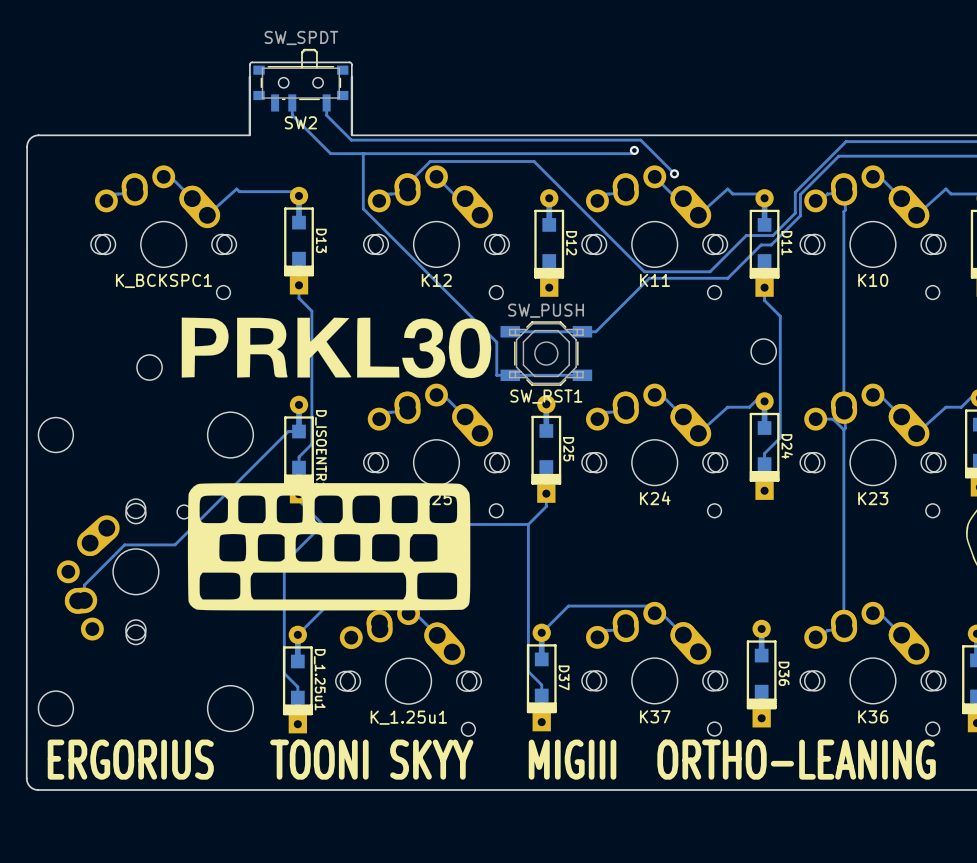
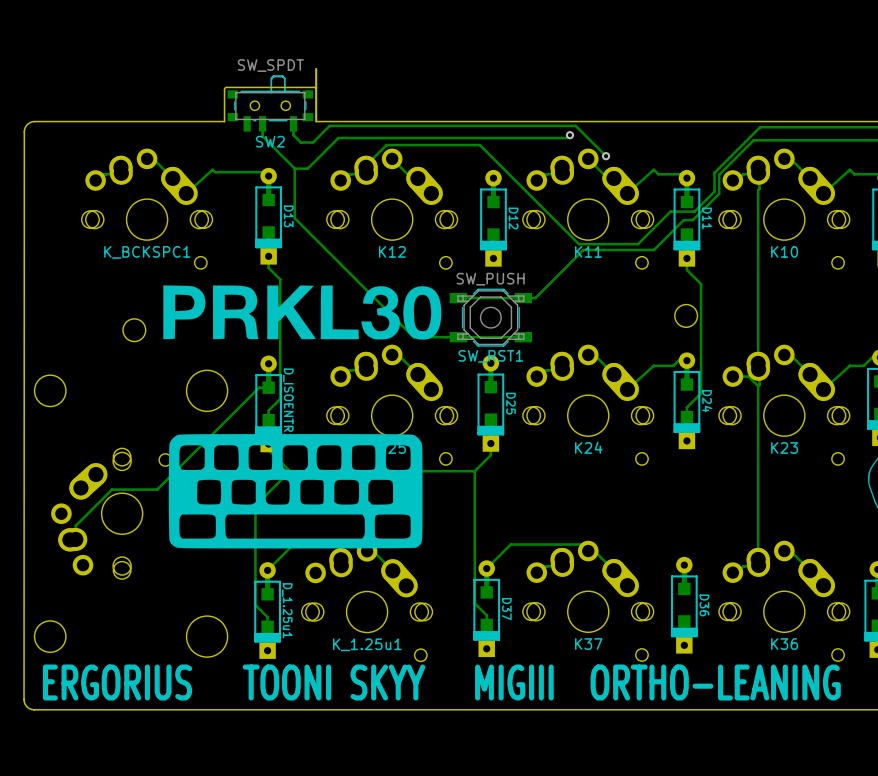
board edge: (249, 76) (249, 135) -> (316, 89) (314, 87) (225, 87) (224, 121)
board edge: (351, 76) (351, 64) (349, 62) (251, 62) (249, 64) (249, 76) -> none
SW2 position: (300, 80) -> (270, 103)
track: (292, 102) (292, 115) (330, 153) (376, 153) -> (294, 168) (307, 168) (338, 138)
track: (326, 102) (326, 115) (351, 140) (366, 140) -> (293, 123) (293, 135) (300, 142) (313, 142) (329, 125)
track: none -> (262, 123) (262, 136) (294, 168)
track: (363, 153) (363, 208) (496, 342) (496, 375) -> (294, 168) (294, 218) (413, 337) (446, 337)

